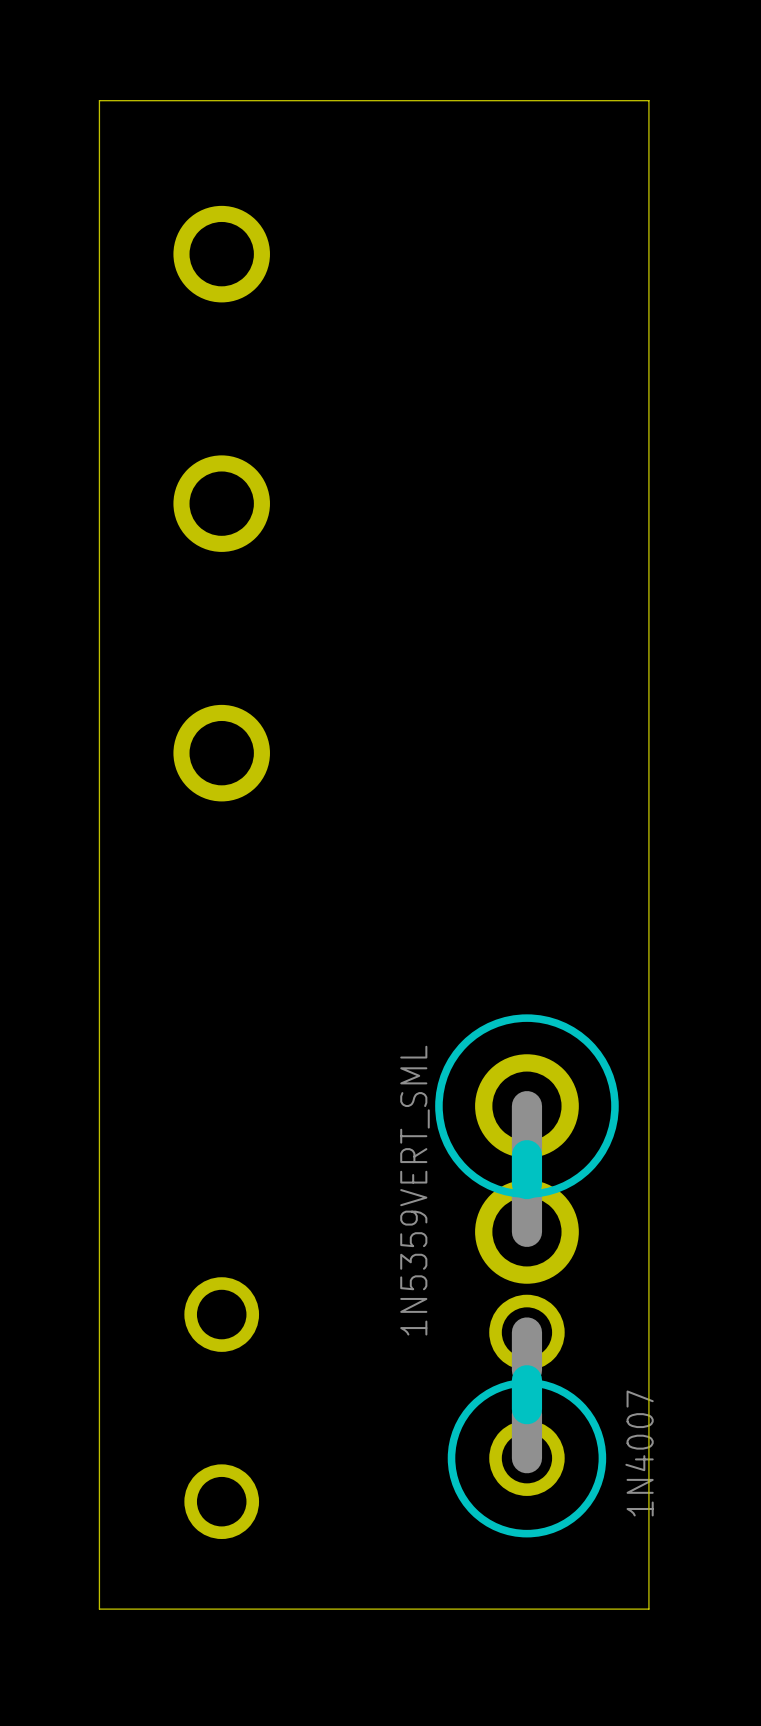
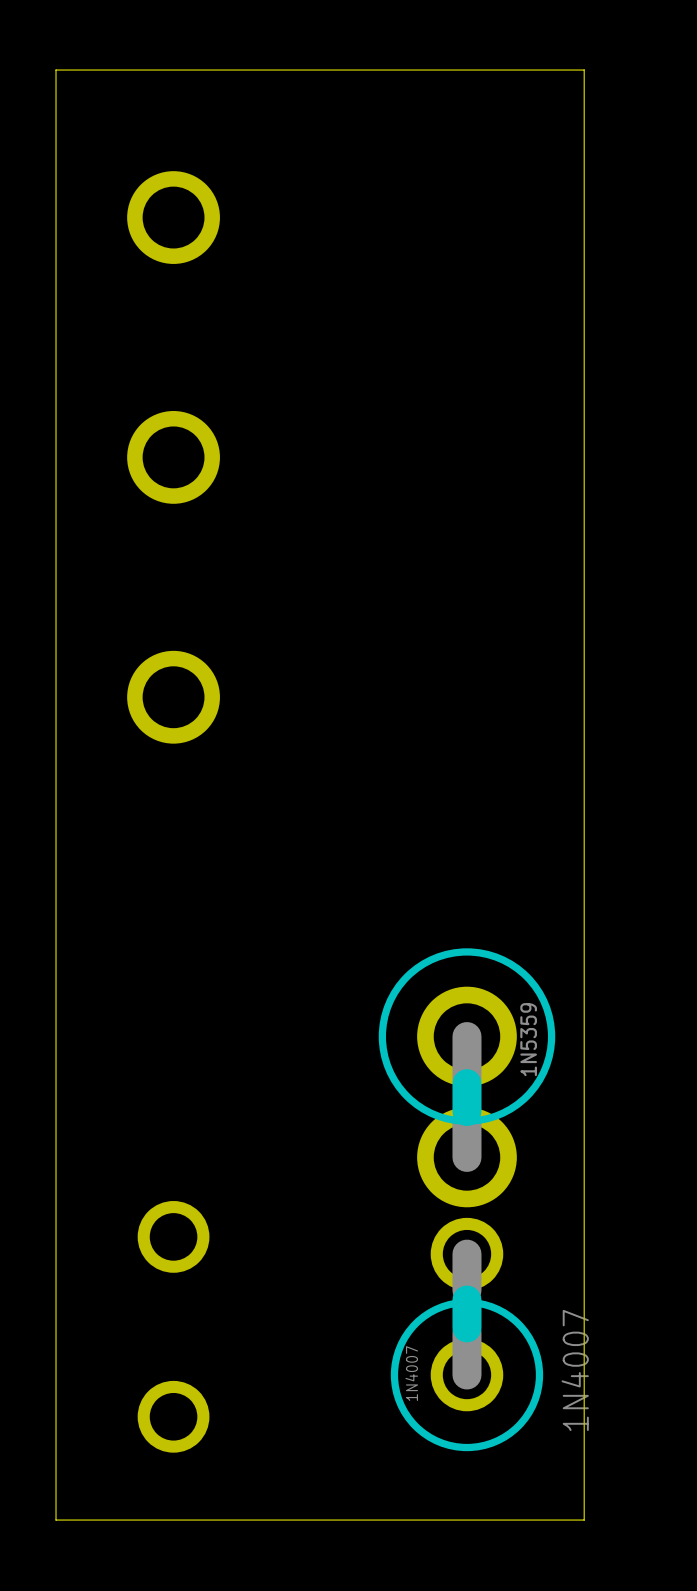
part text: none -> 1N5359 (528, 1039)
part value: 1N5359VERT_SML (414, 1190) -> none
part text: none -> 1N4007 (411, 1373)

